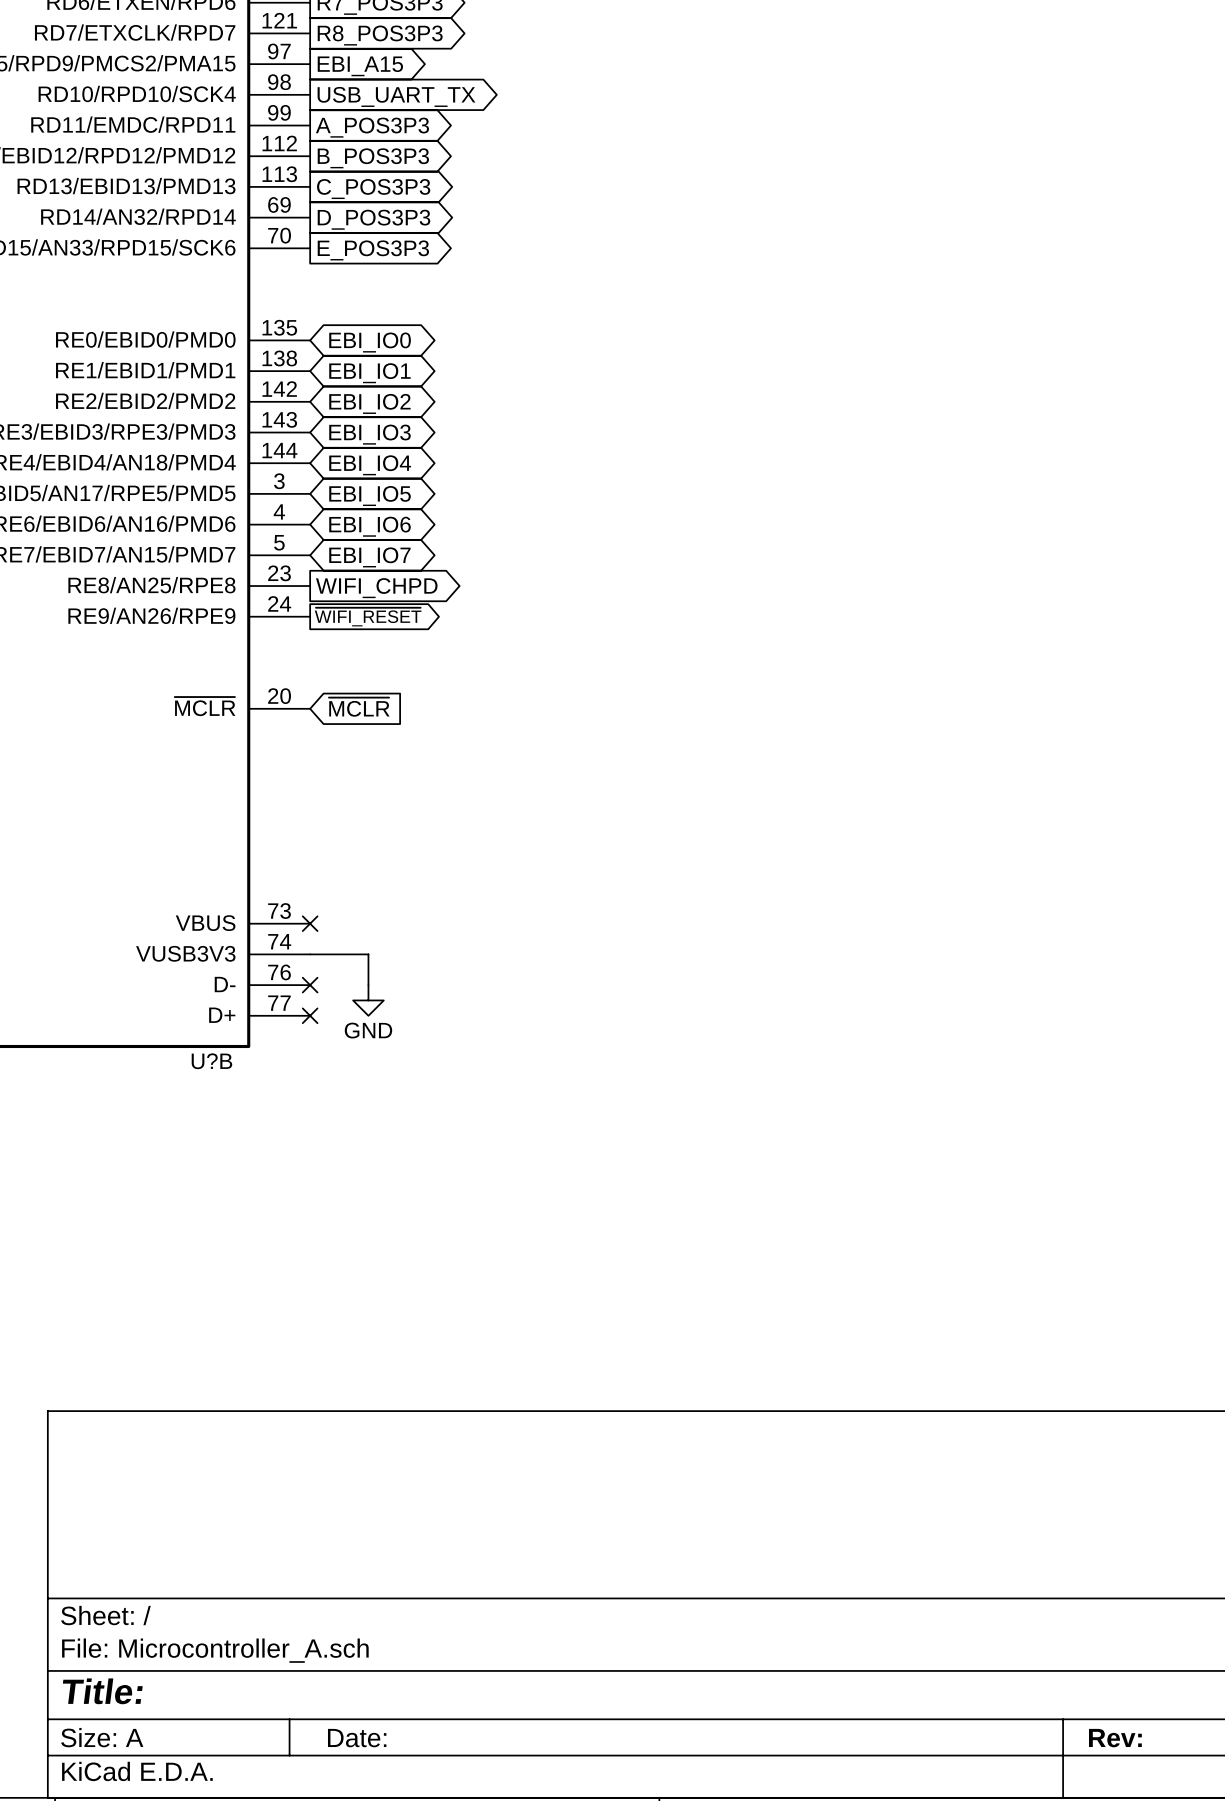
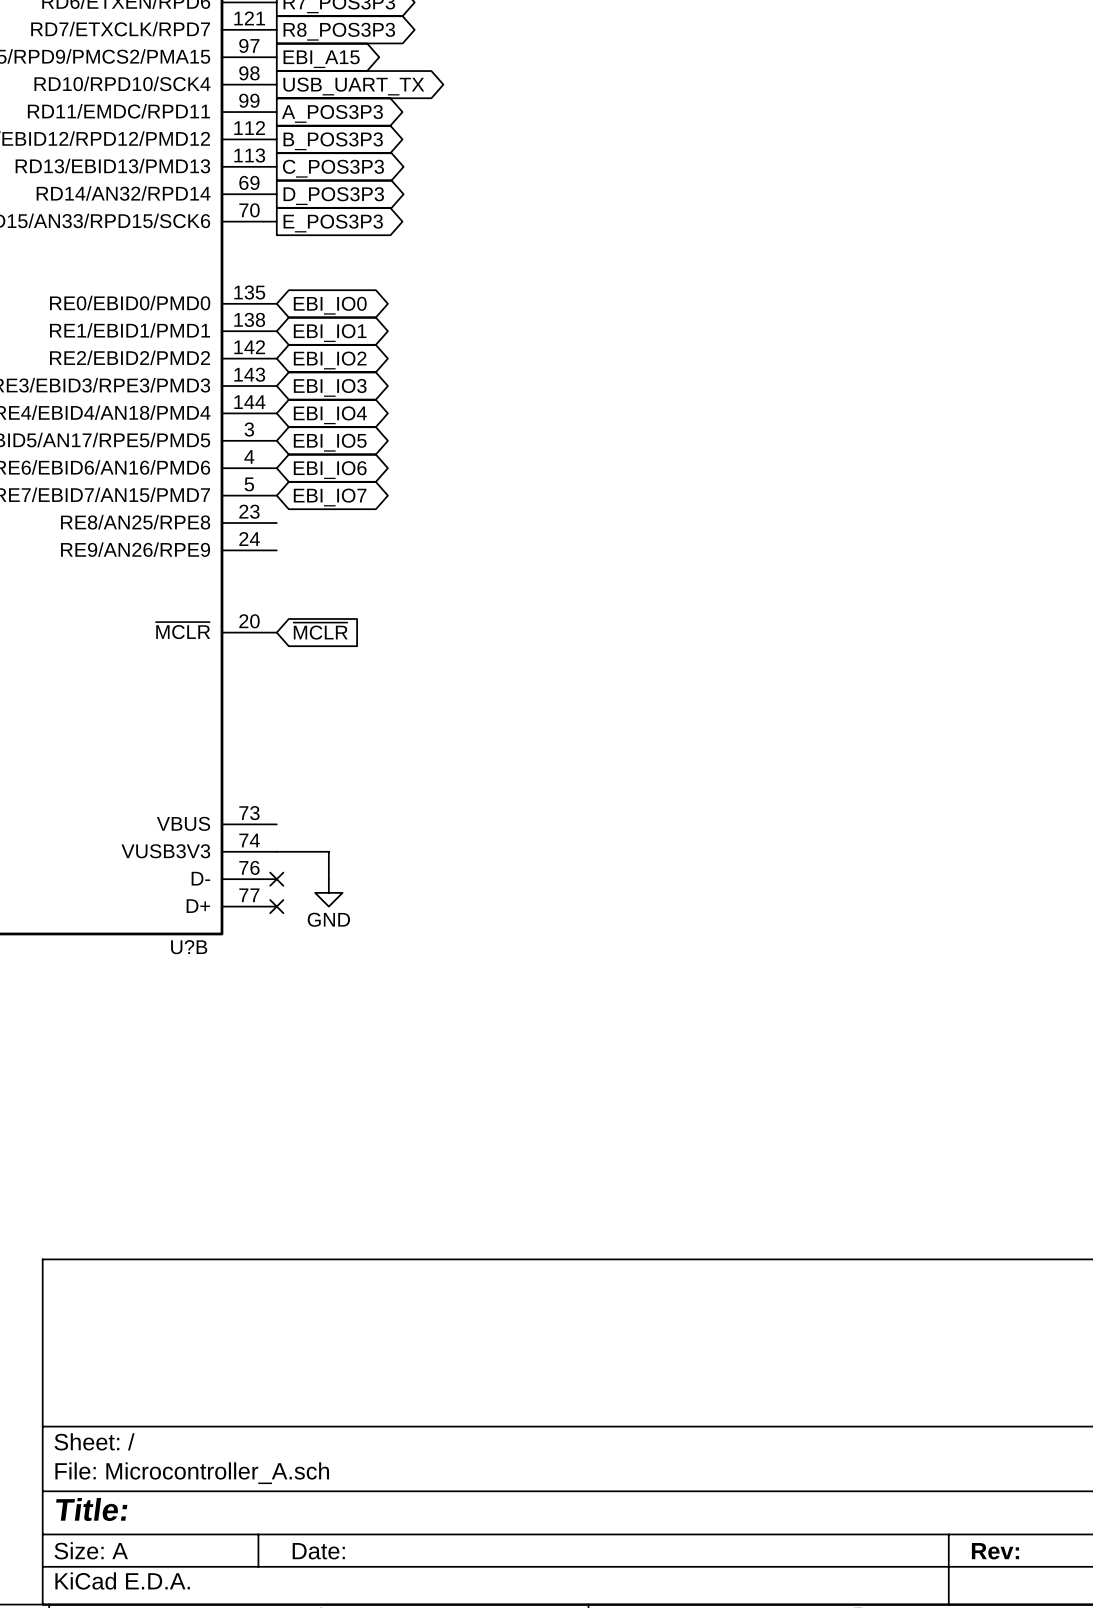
global label: WIFI_CHPD (376, 588) -> none
global label: ~{WIFI_RESET} (368, 617) -> none
no-connect mark: (310, 923) -> none

